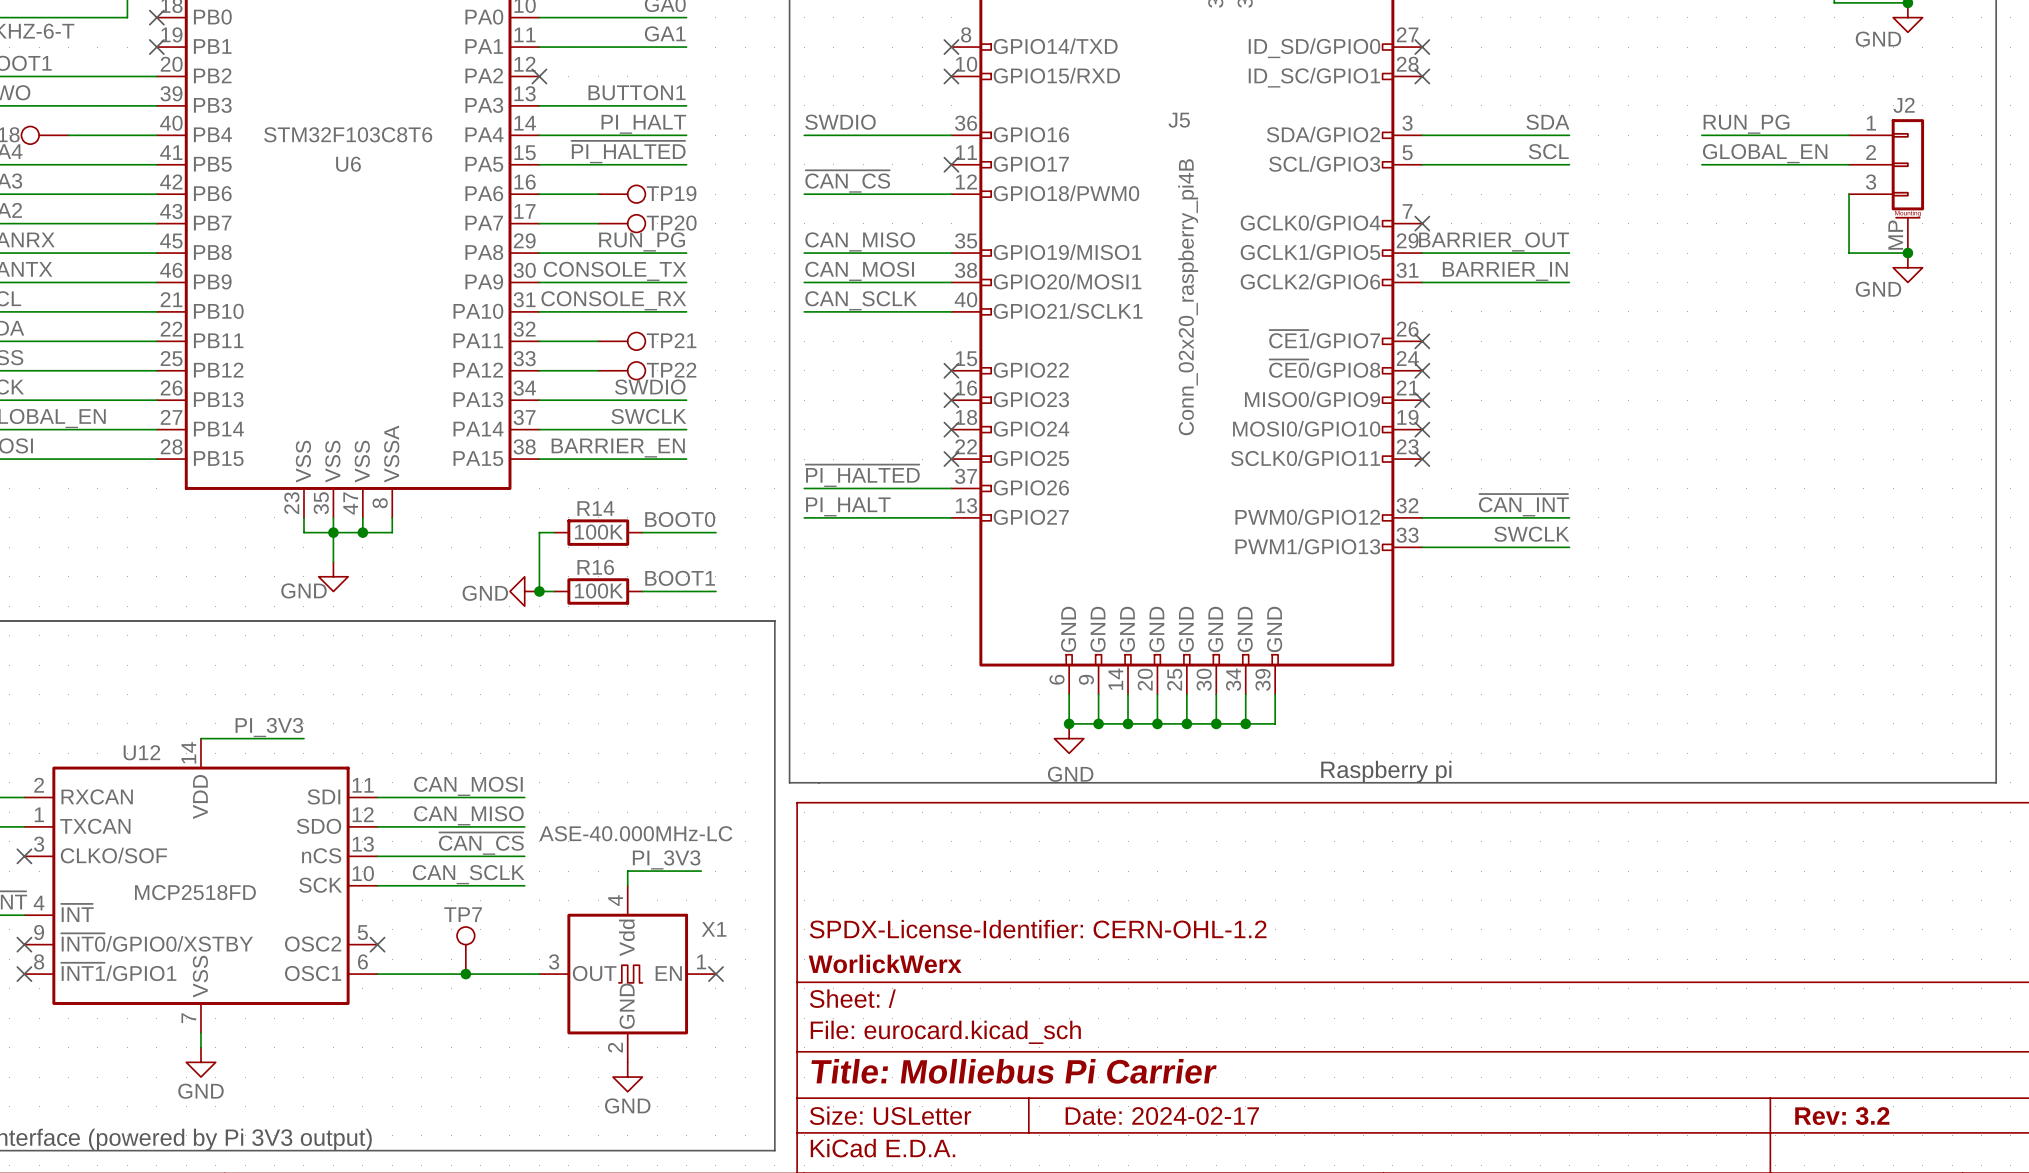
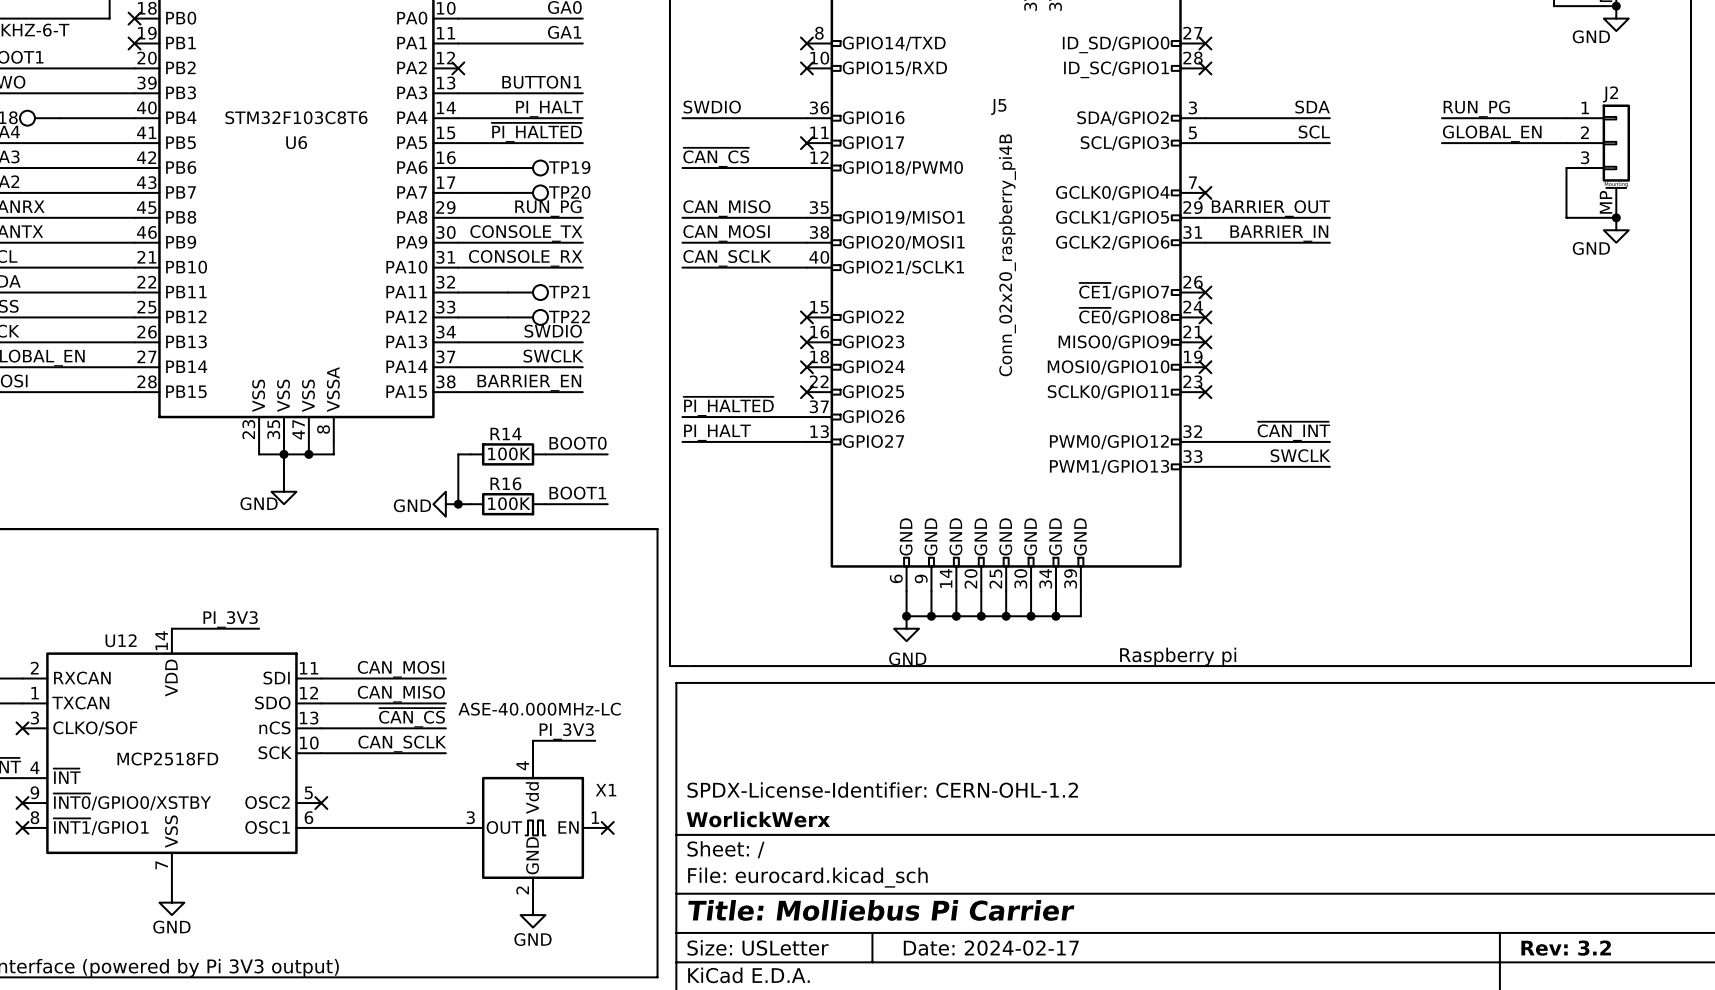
TP7: (465, 950) -> none
junction: (465, 974) -> none

